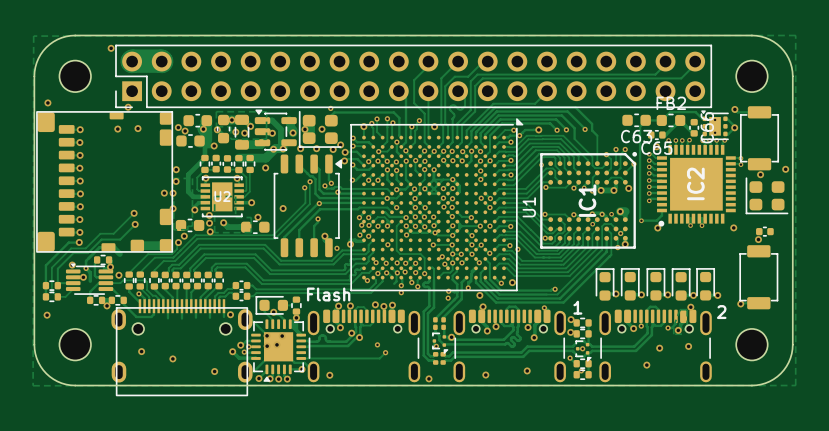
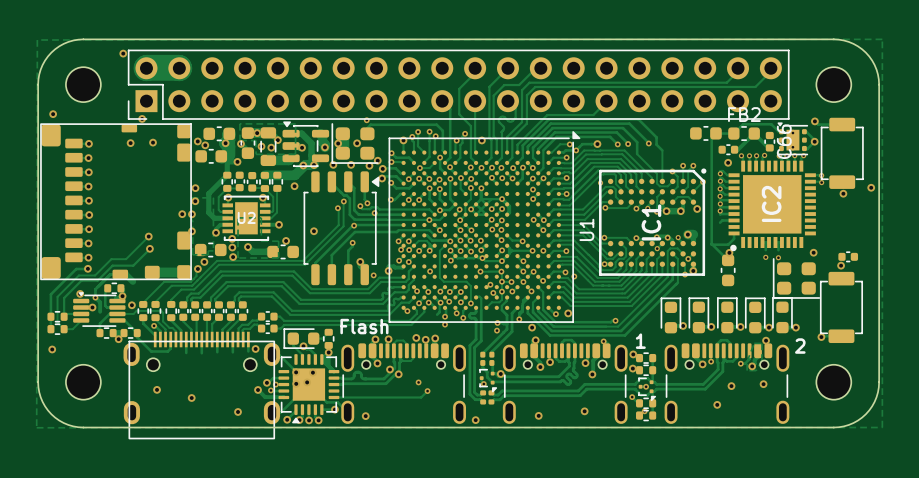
track: (641, 124) (640, 126) (641, 220) -> (711, 138) (711, 243) (728, 260)
C63 name: C63 (636, 136) -> none
C65 name: C65 (656, 148) -> none
via: (649, 154) -> none
via: none -> (720, 173)
via: (649, 160) -> none
via: none -> (720, 181)
via: (649, 166) -> none
via: none -> (720, 188)
via: (649, 173) -> none
via: none -> (720, 196)
via: (649, 180) -> none
via: none -> (720, 203)
via: (649, 186) -> none
via: none -> (720, 211)
via: (649, 193) -> none
part position: (767, 195) -> (796, 278)
via: (649, 200) -> none
via: (641, 220) -> none
via: (690, 225) -> none
via: (702, 225) -> none
via: none -> (765, 257)
via: none -> (778, 257)
part: none -> (728, 270)

